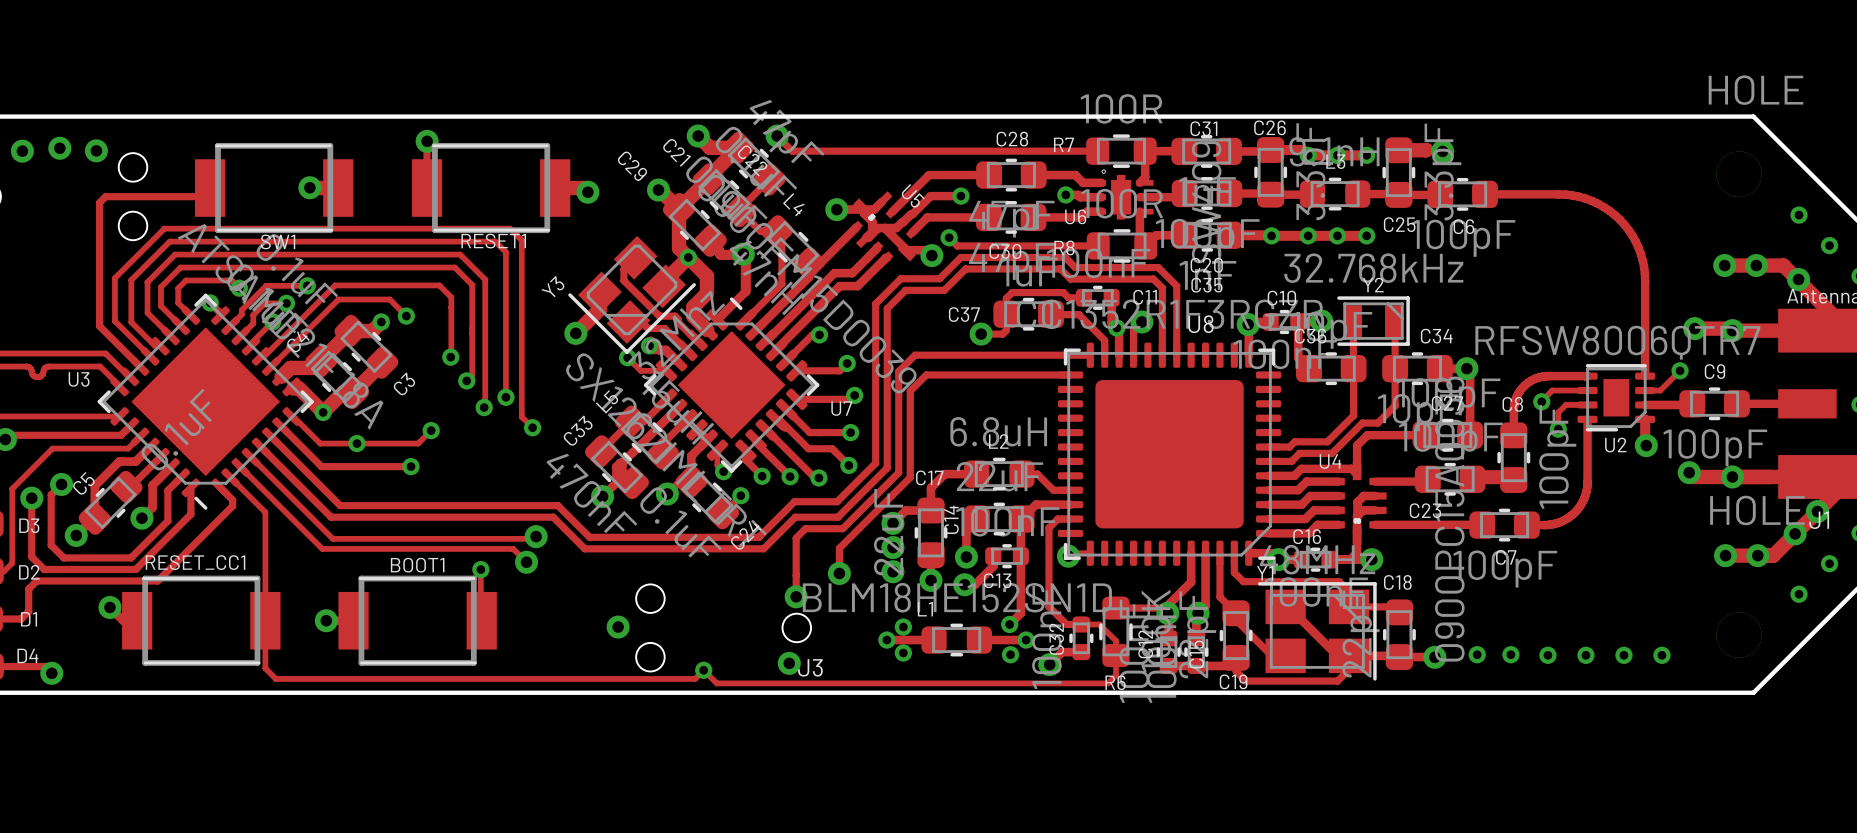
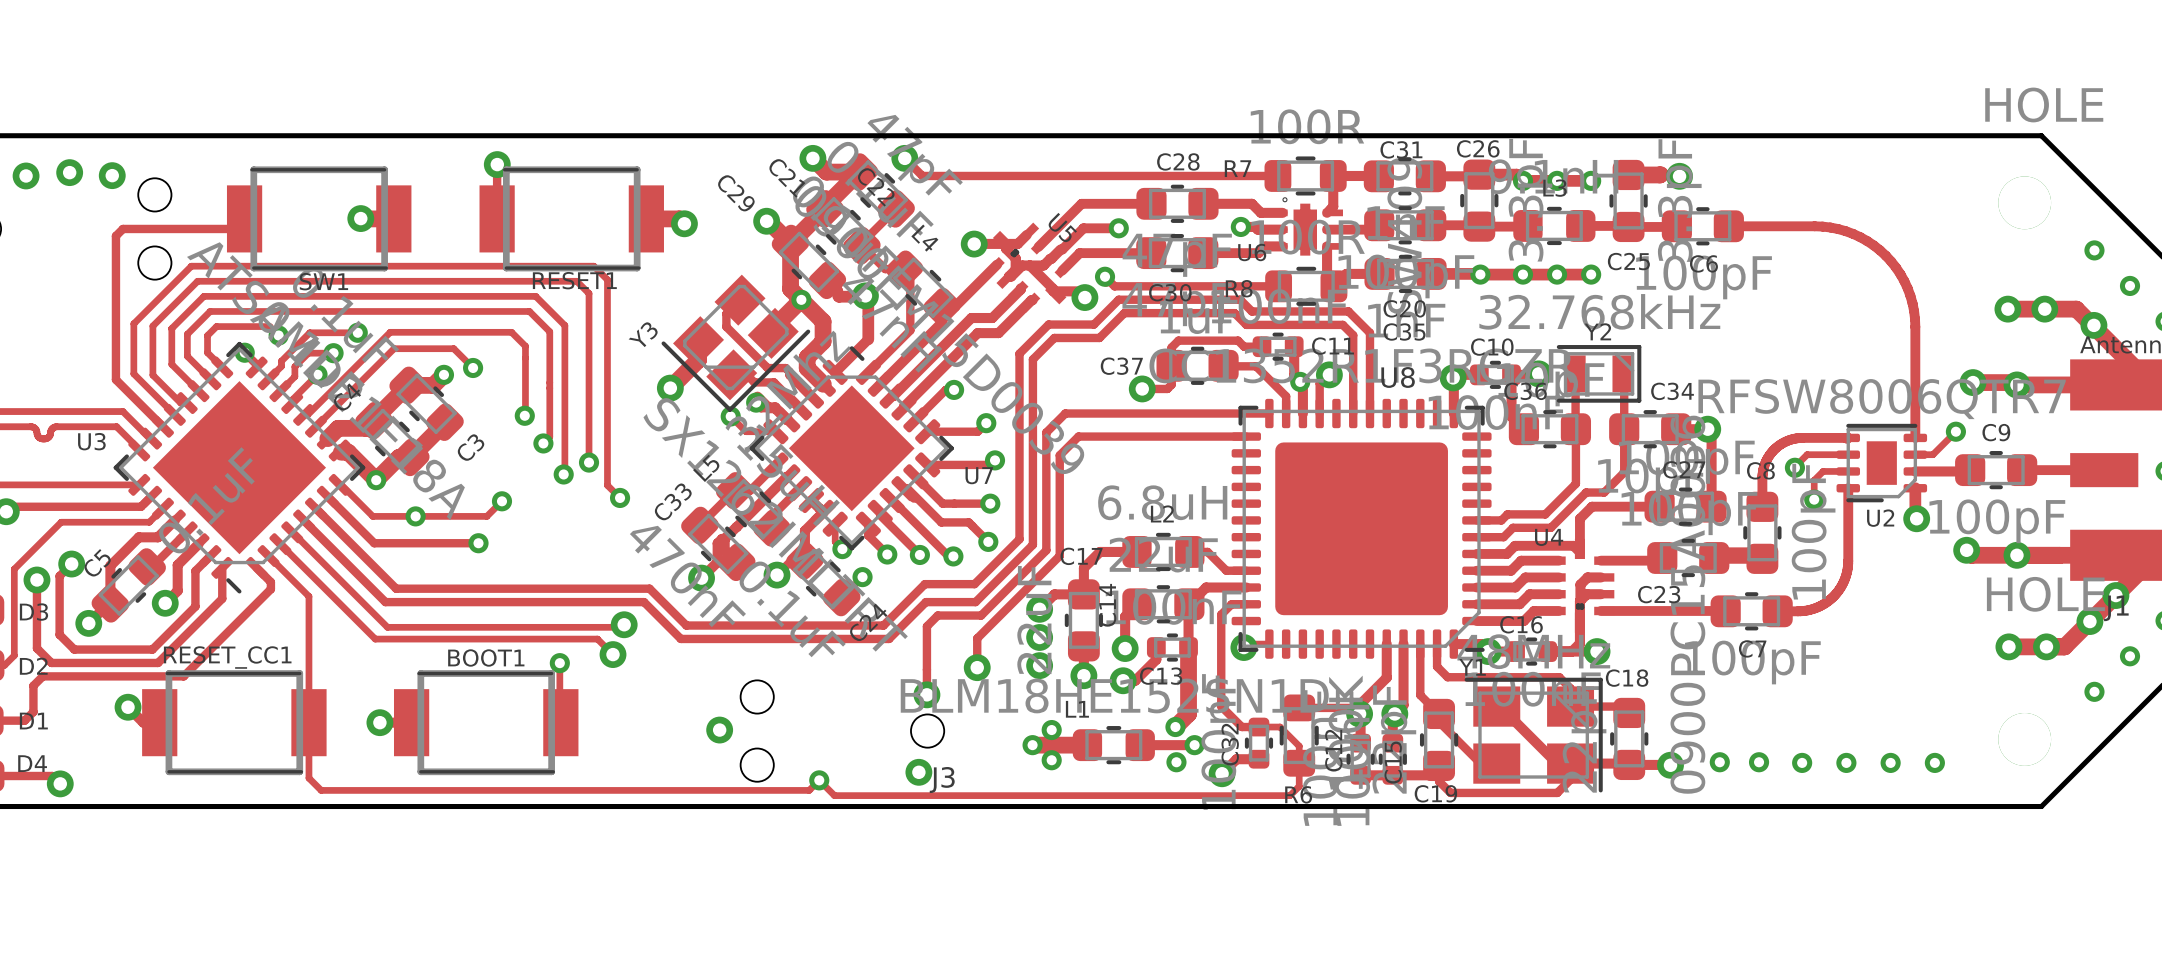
track width: thin (1020, 556) (1020, 613) (1009, 624) -> thick (1188, 647) (1188, 713) (1175, 727)
track width: thin (886, 640) (934, 640) -> thick (1032, 745) (1087, 745)

